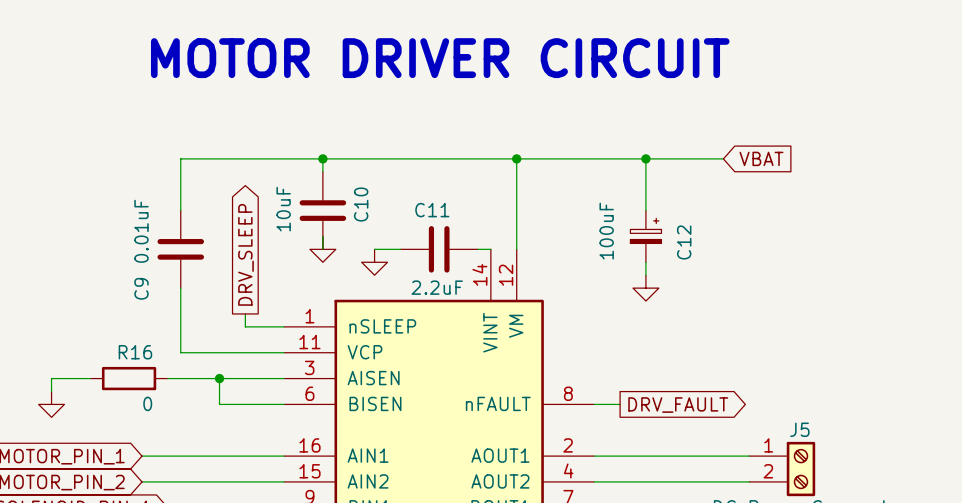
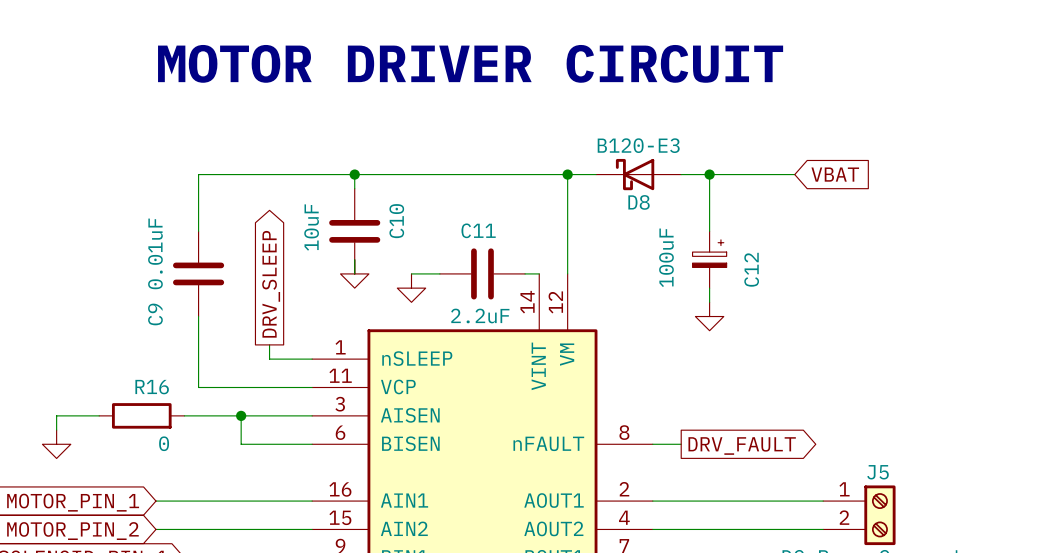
D8: none -> B120-E3 (638, 174)

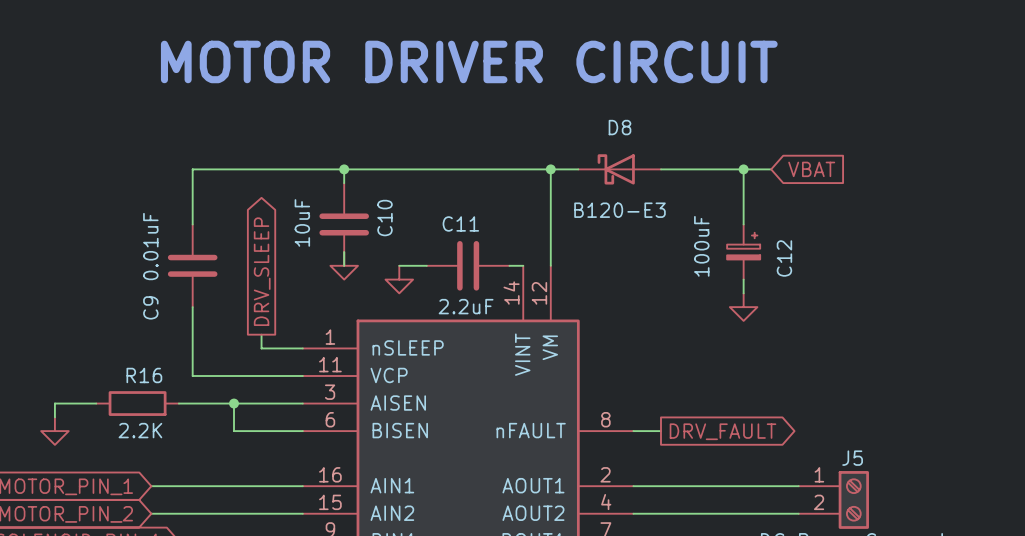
D8 value position: B120-E3 (638, 145) -> B120-E3 (620, 210)
wire: (709, 174) (709, 231) -> (743, 169) (743, 224)
junction position: (709, 174) -> (743, 169)
D8 name position: D8 (639, 202) -> D8 (620, 127)
C12 position: (709, 259) -> (743, 252)
wire: (709, 288) (709, 302) -> (743, 279) (743, 293)
power symbol position: (709, 316) -> (743, 307)
R16 value: 0 (164, 443) -> 2.2K (140, 430)

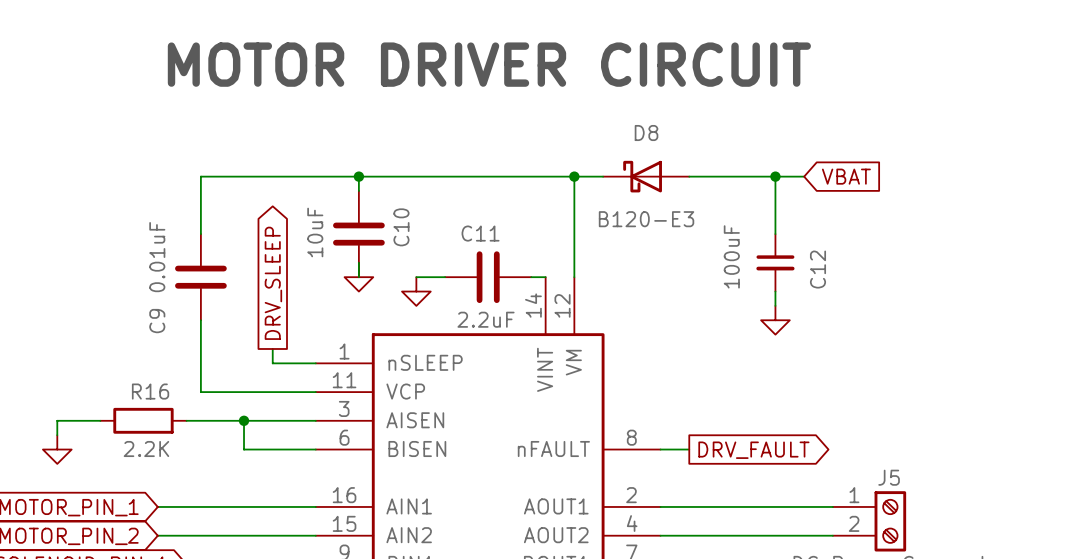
C12 symbol: [727, 224, 761, 280] -> [756, 234, 795, 292]

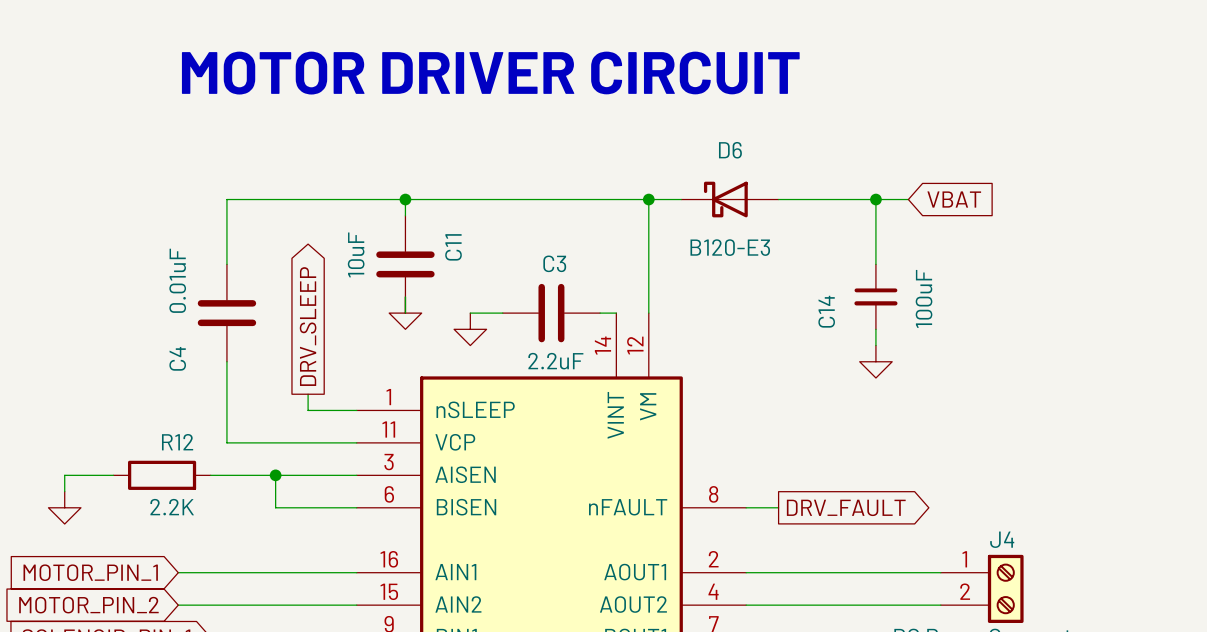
D8 name: D8 (646, 133) -> D6 (730, 150)
C10 name: C10 (401, 227) -> C11 (453, 247)
C11 name: C11 (480, 233) -> C3 (554, 263)
C12 value position: 100uF (731, 256) -> 100uF (924, 298)
C12 name: C12 (817, 269) -> C14 (826, 311)
C9 name: C9 (157, 321) -> C4 (177, 358)
R16 name: R16 (150, 391) -> R12 (177, 442)
J5 name: J5 (889, 477) -> J4 (1002, 539)

